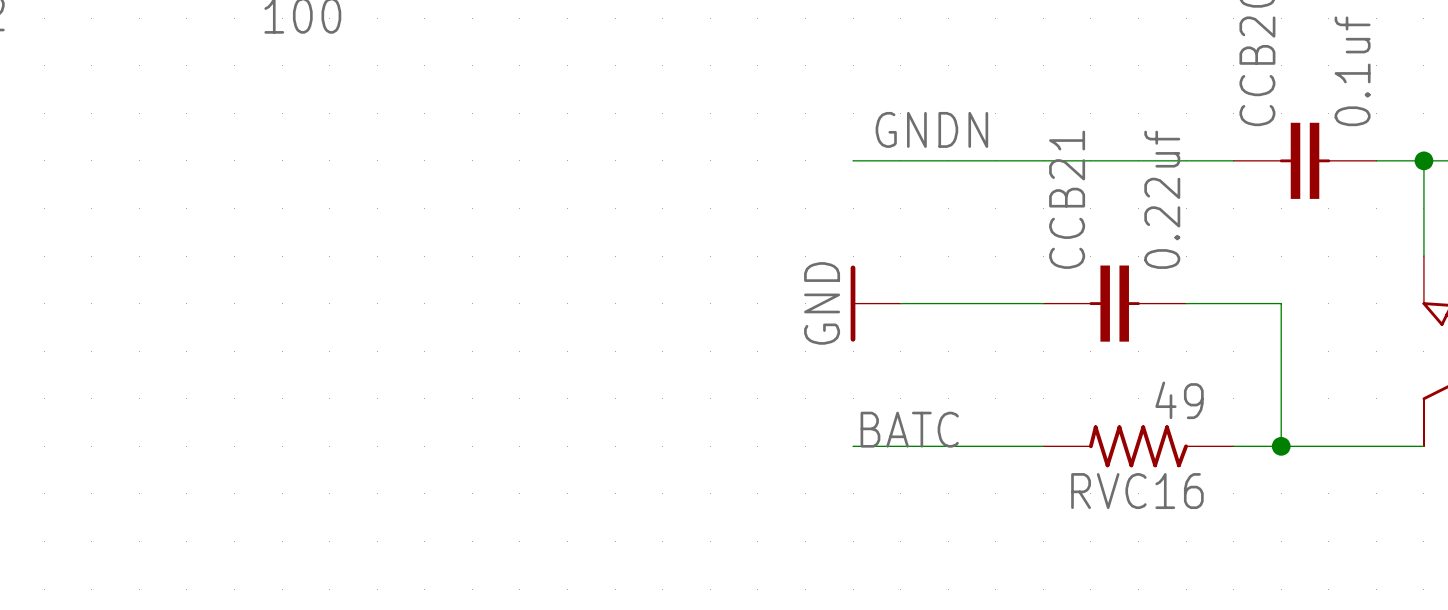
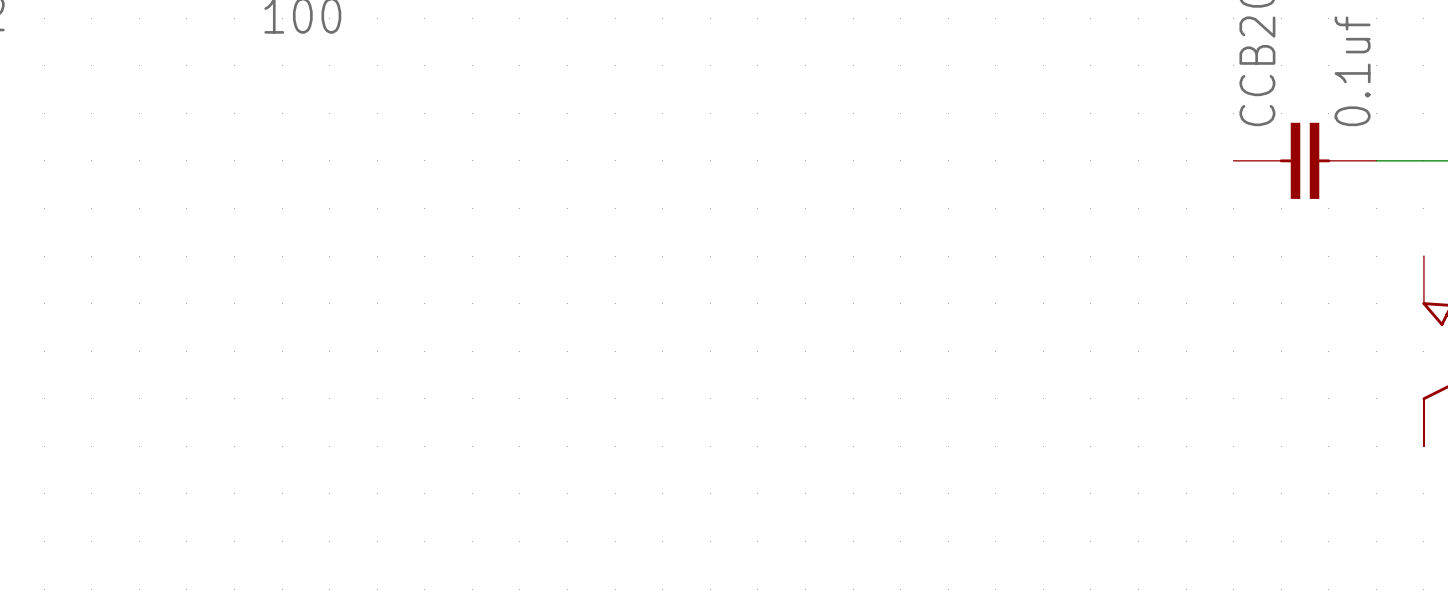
label: GNDN (931, 129) -> none
wire: (853, 160) (1233, 160) -> none
wire: (1423, 160) (1423, 256) -> none
junction: (1423, 160) -> none
power symbol: GND (875, 303) -> none
wire: (900, 303) (1043, 303) -> none
CCB21: 0.22uf (1114, 303) -> none
wire: (1186, 303) (1281, 303) (1281, 446) -> none
label: BATC (909, 429) -> none
wire: (853, 446) (1043, 446) -> none
RVC16: 49 (1138, 446) -> none
wire: (1233, 446) (1423, 446) -> none
junction: (1281, 446) -> none

